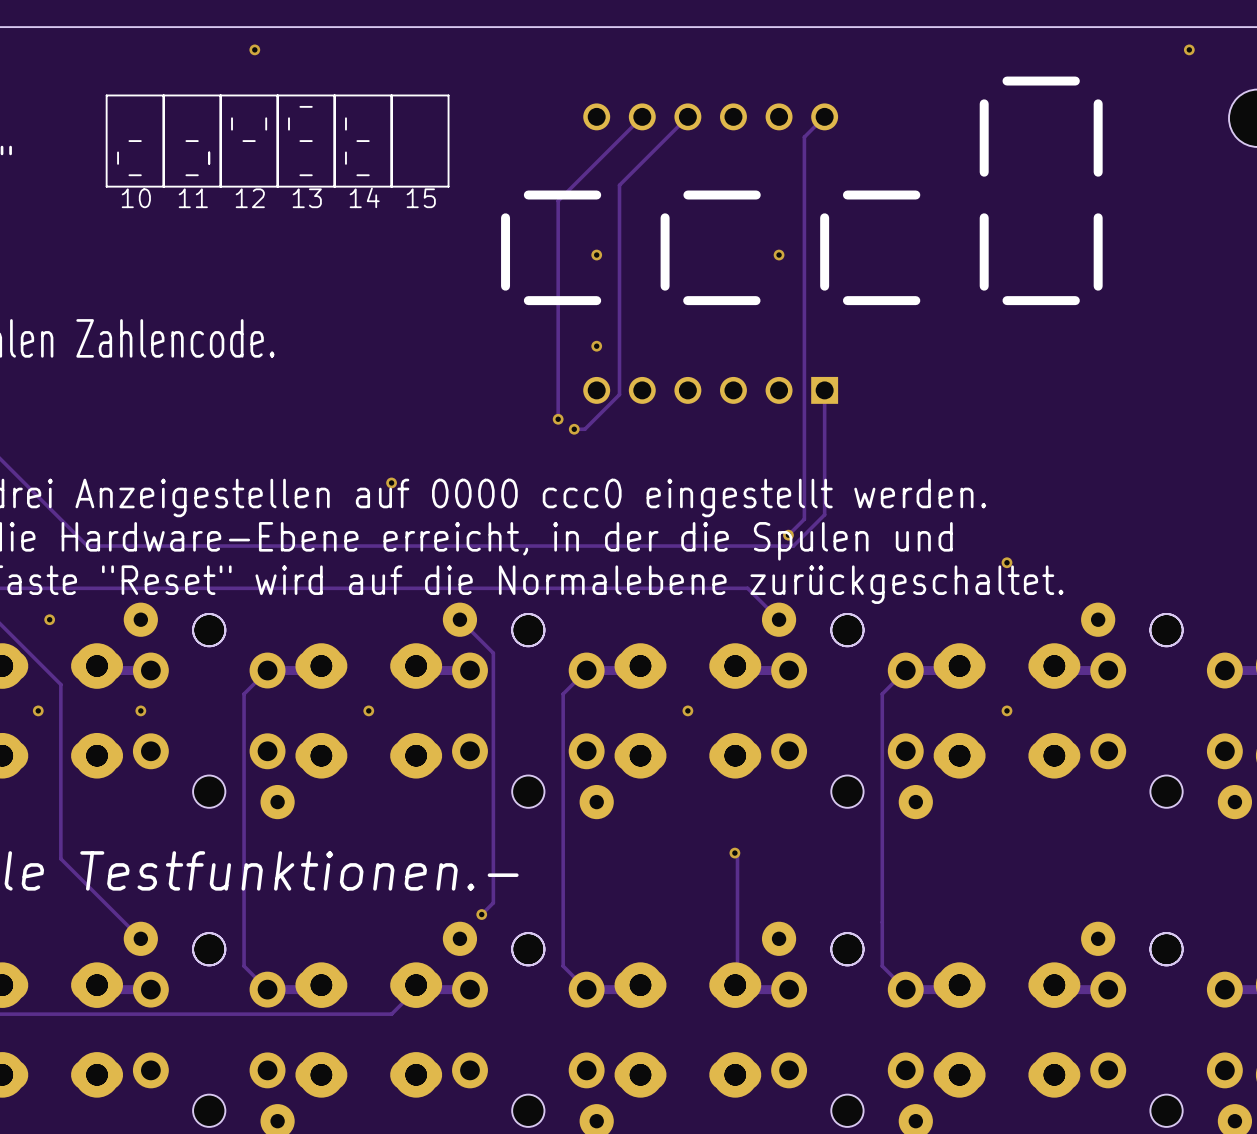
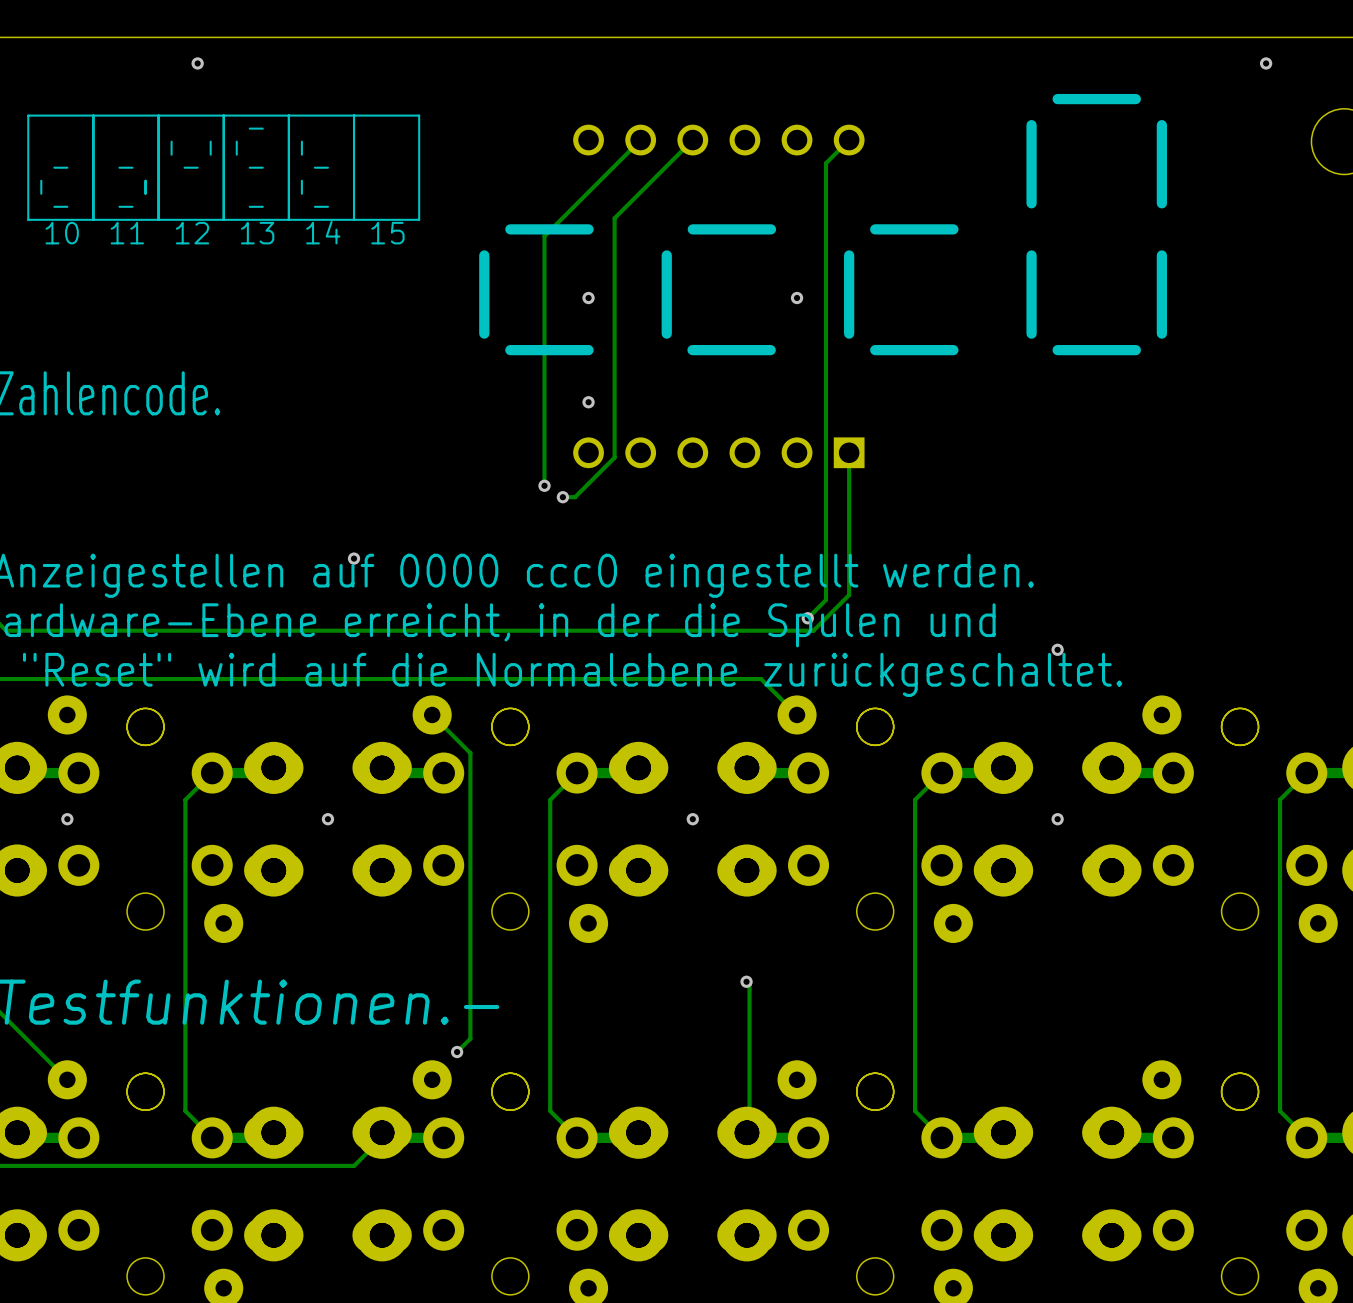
track: none -> (1306, 773) (1280, 799) (1280, 1111) (1306, 1137)

